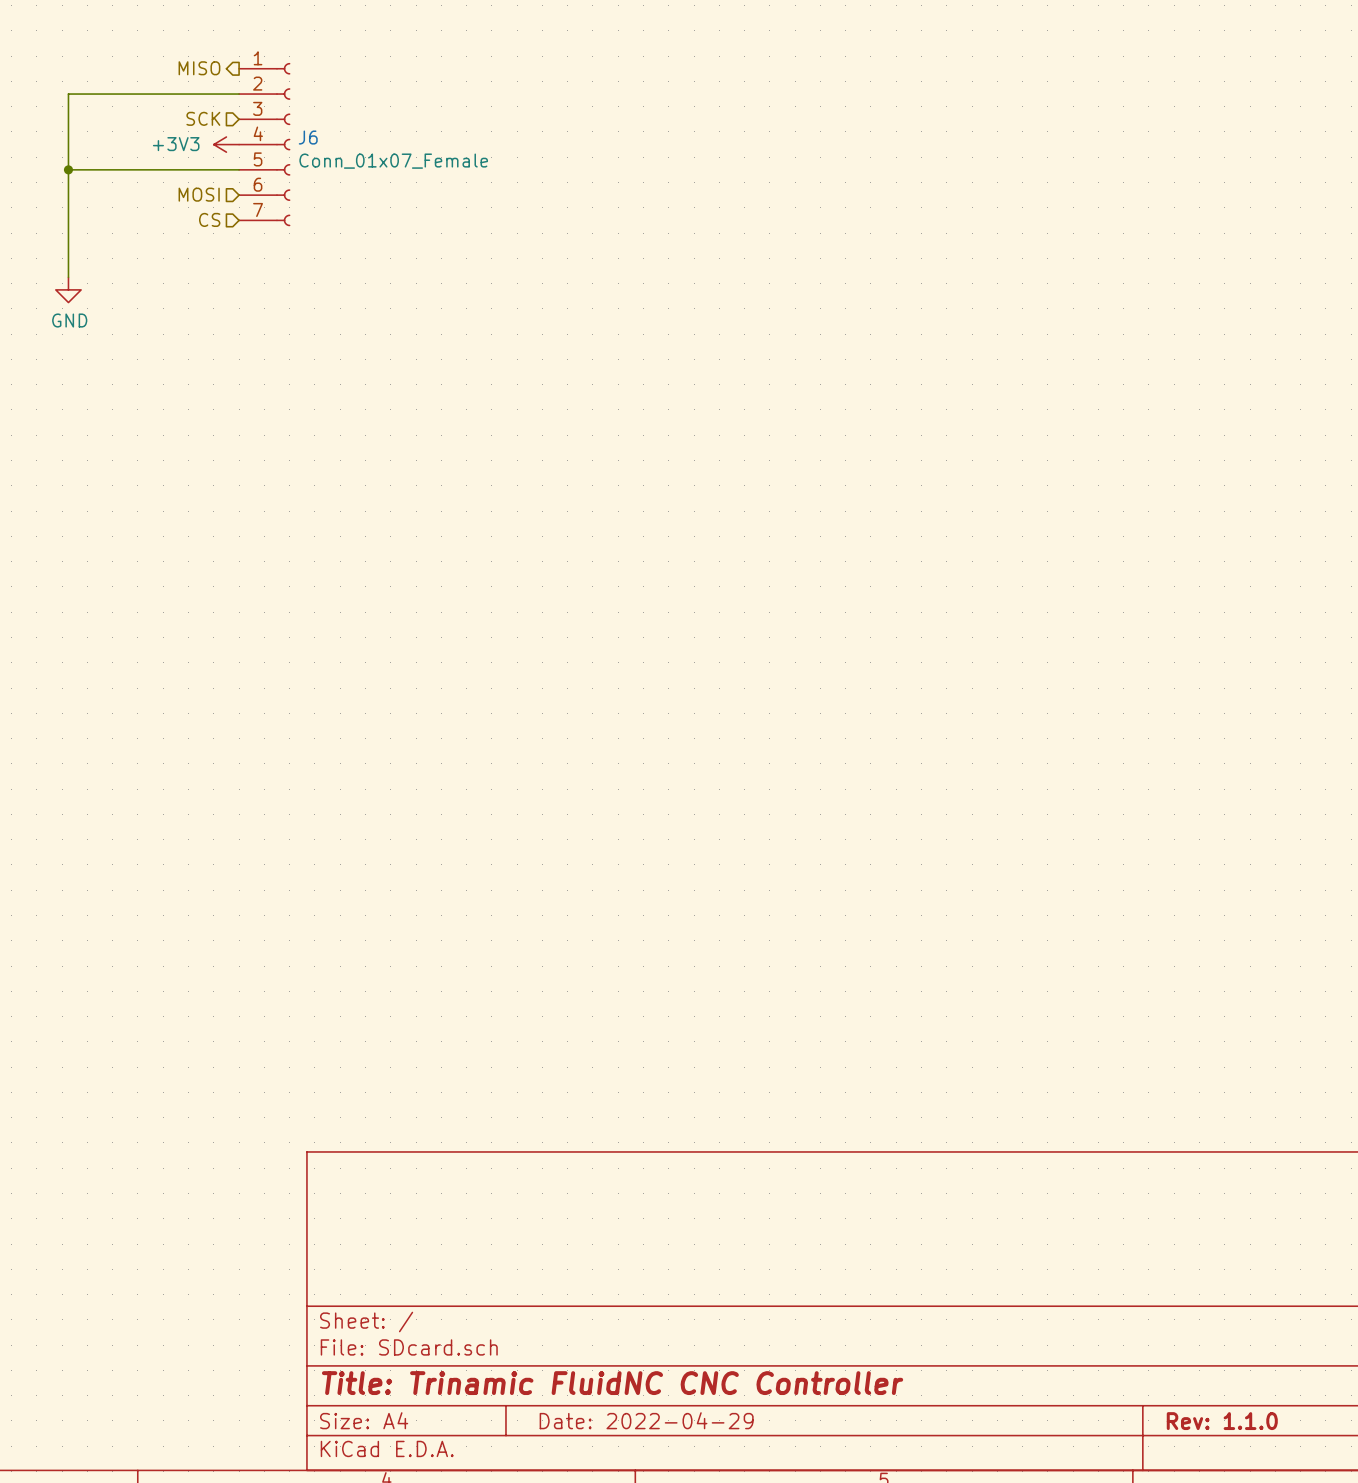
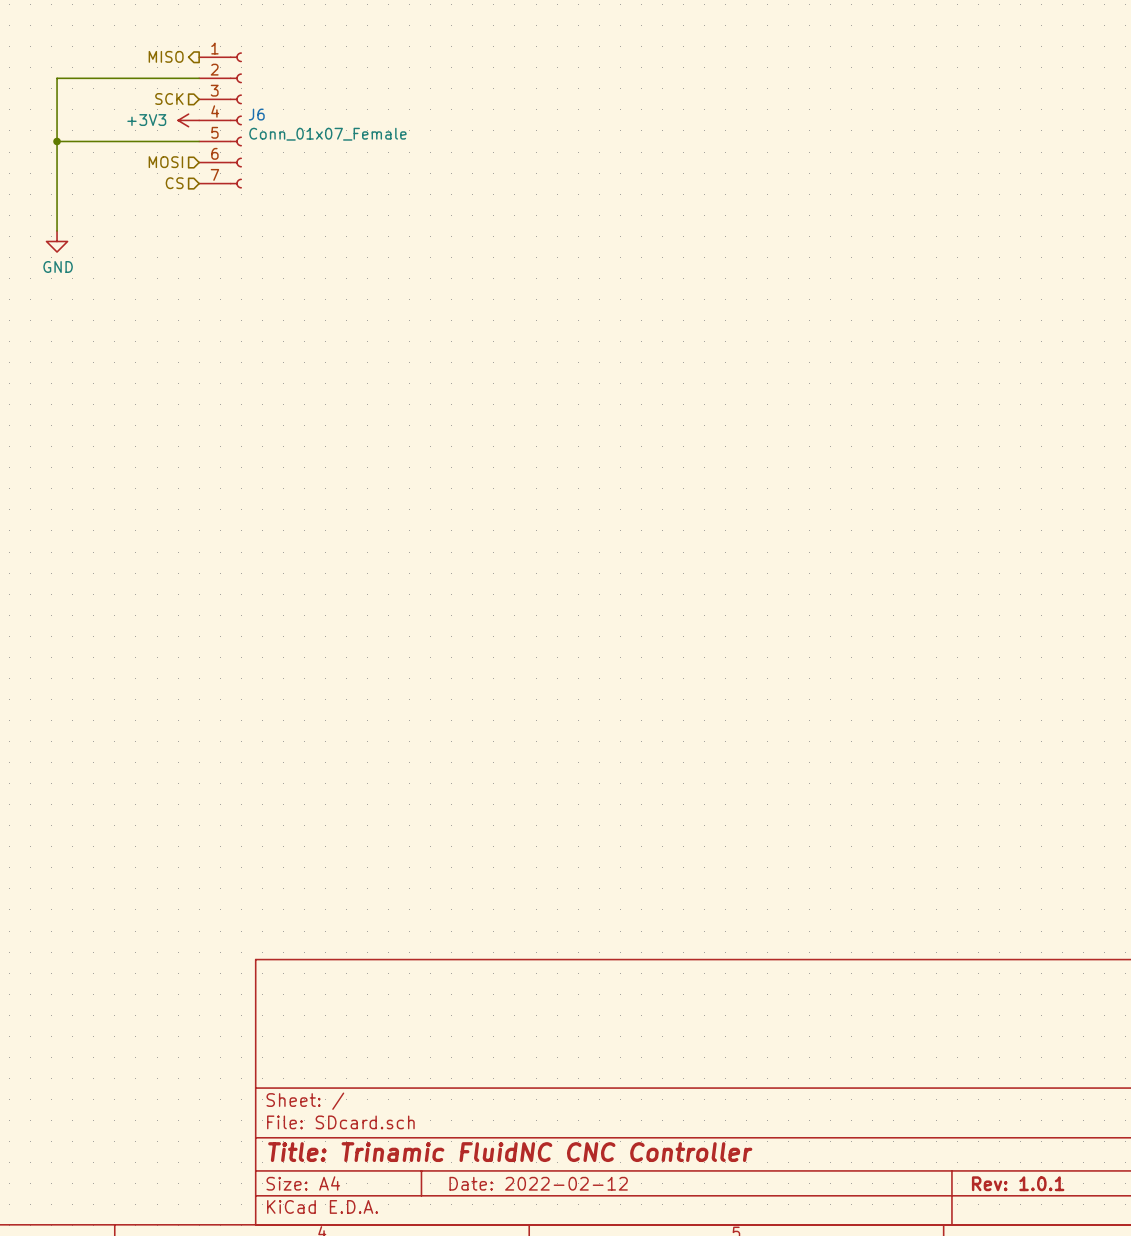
title block: Date: 2022-04-29 (646, 1420) -> Date: 2022-02-12 (538, 1183)
title block: Rev: 1.1.0 (1222, 1421) -> Rev: 1.0.1 (1018, 1183)

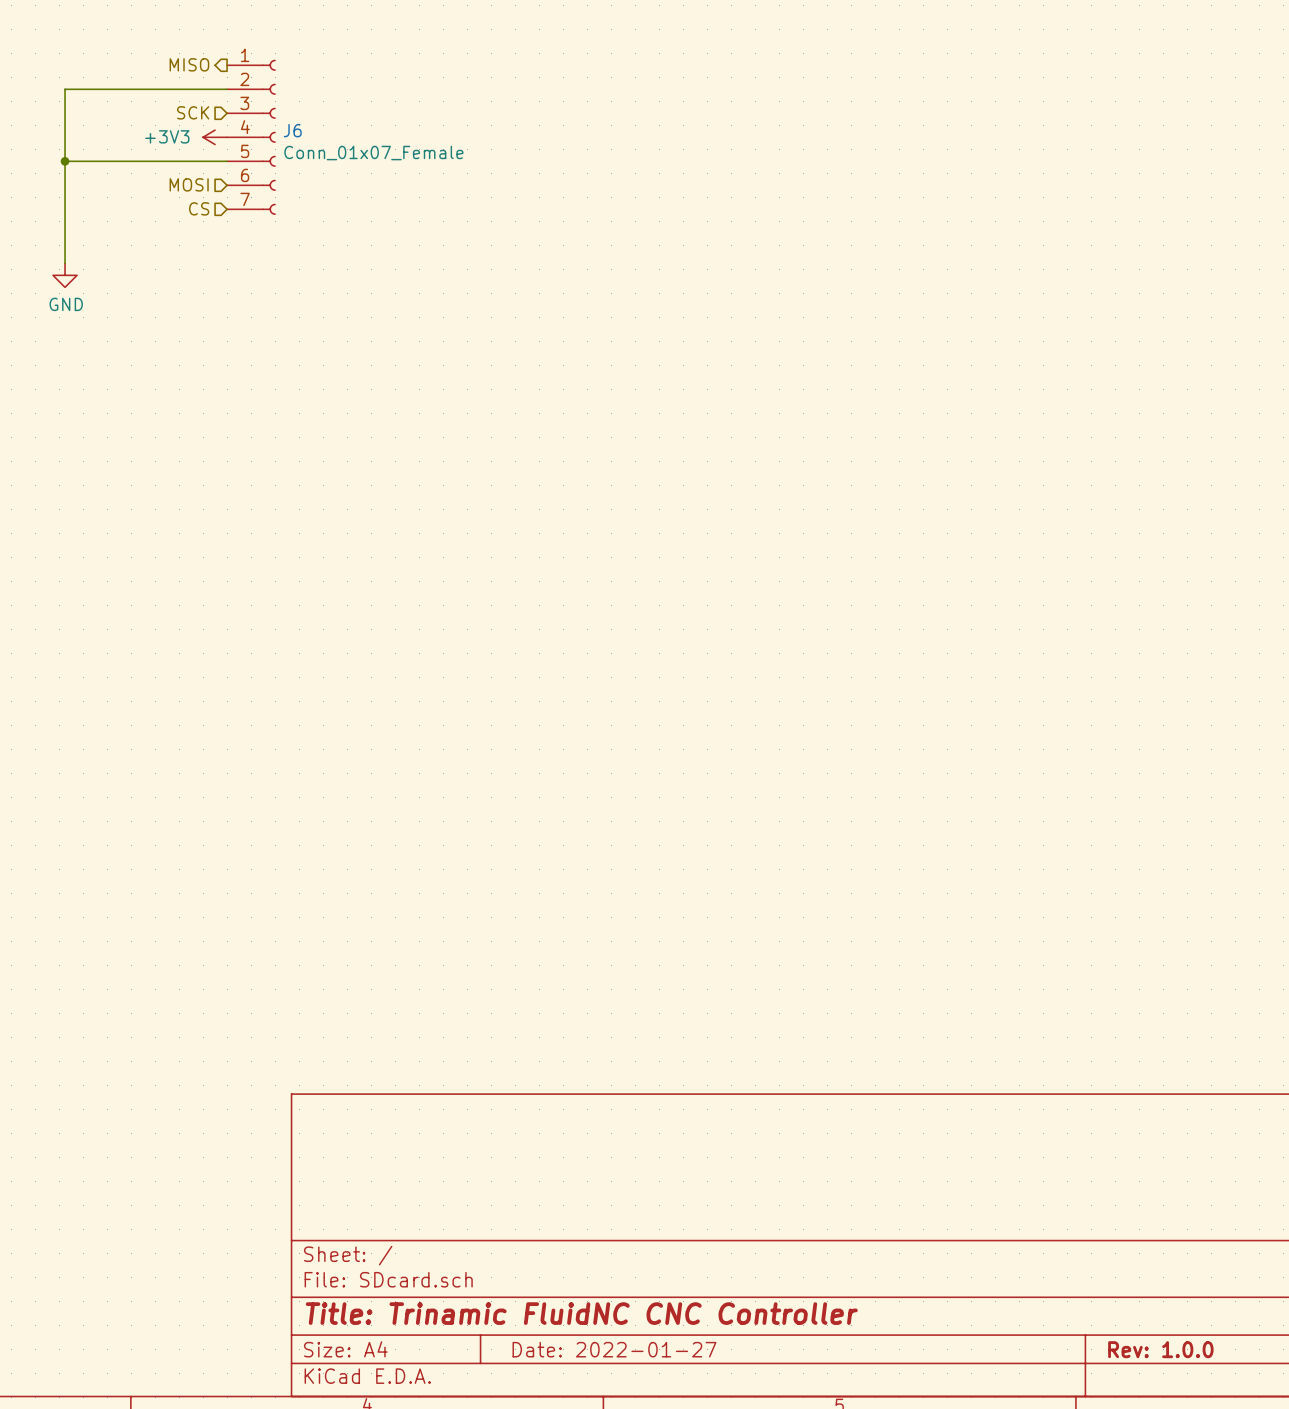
title block: Date: 2022-02-12 (538, 1183) -> Date: 2022-01-27 (614, 1349)
title block: Rev: 1.0.1 (1018, 1183) -> Rev: 1.0.0 (1160, 1349)

